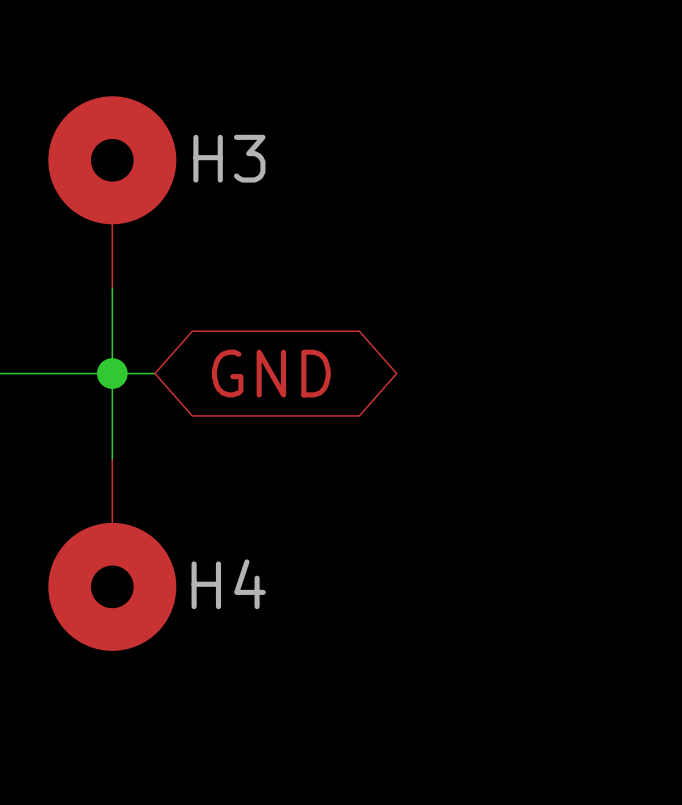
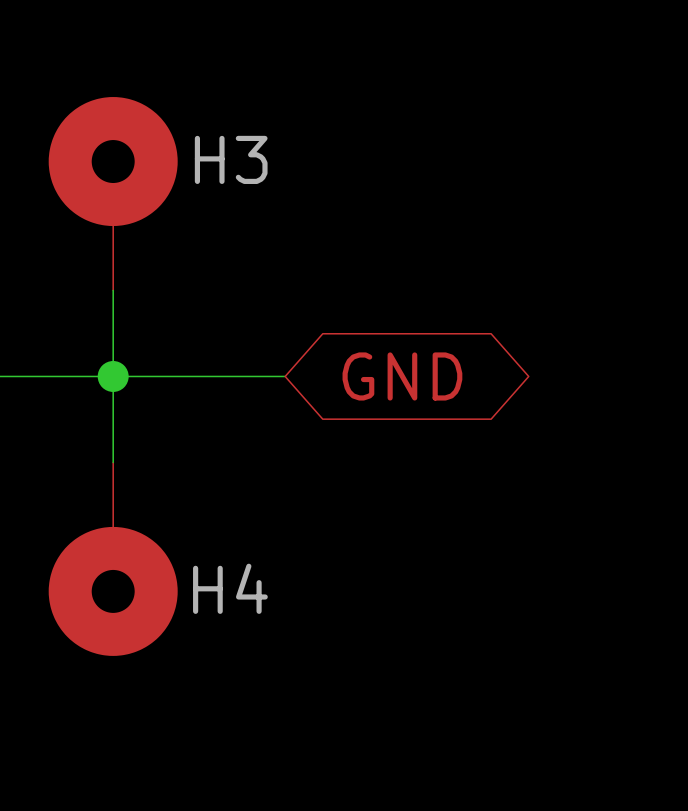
wire: none -> (156, 376) (285, 376)
global label position: GND (271, 373) -> GND (402, 376)

